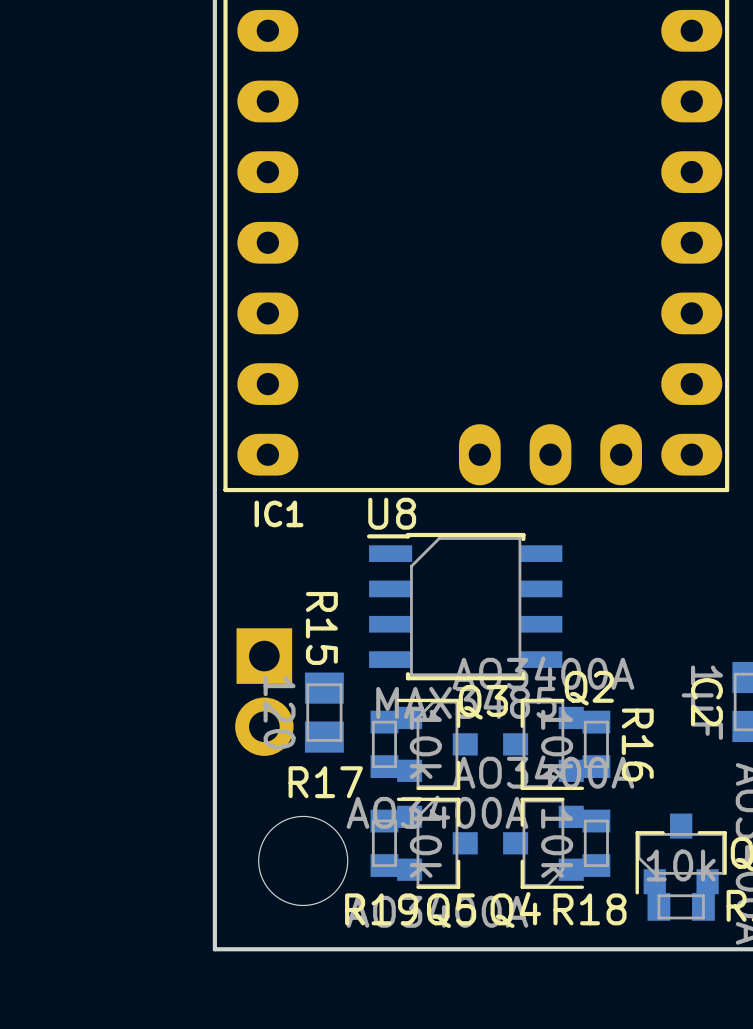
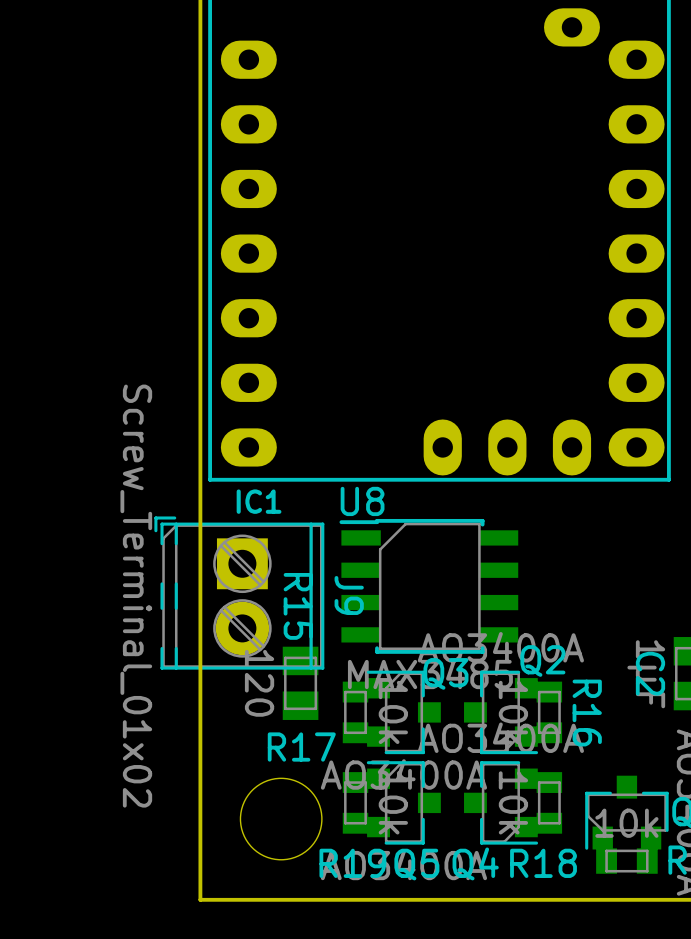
J9 side: top (264, 692) -> bottom (239, 593)

